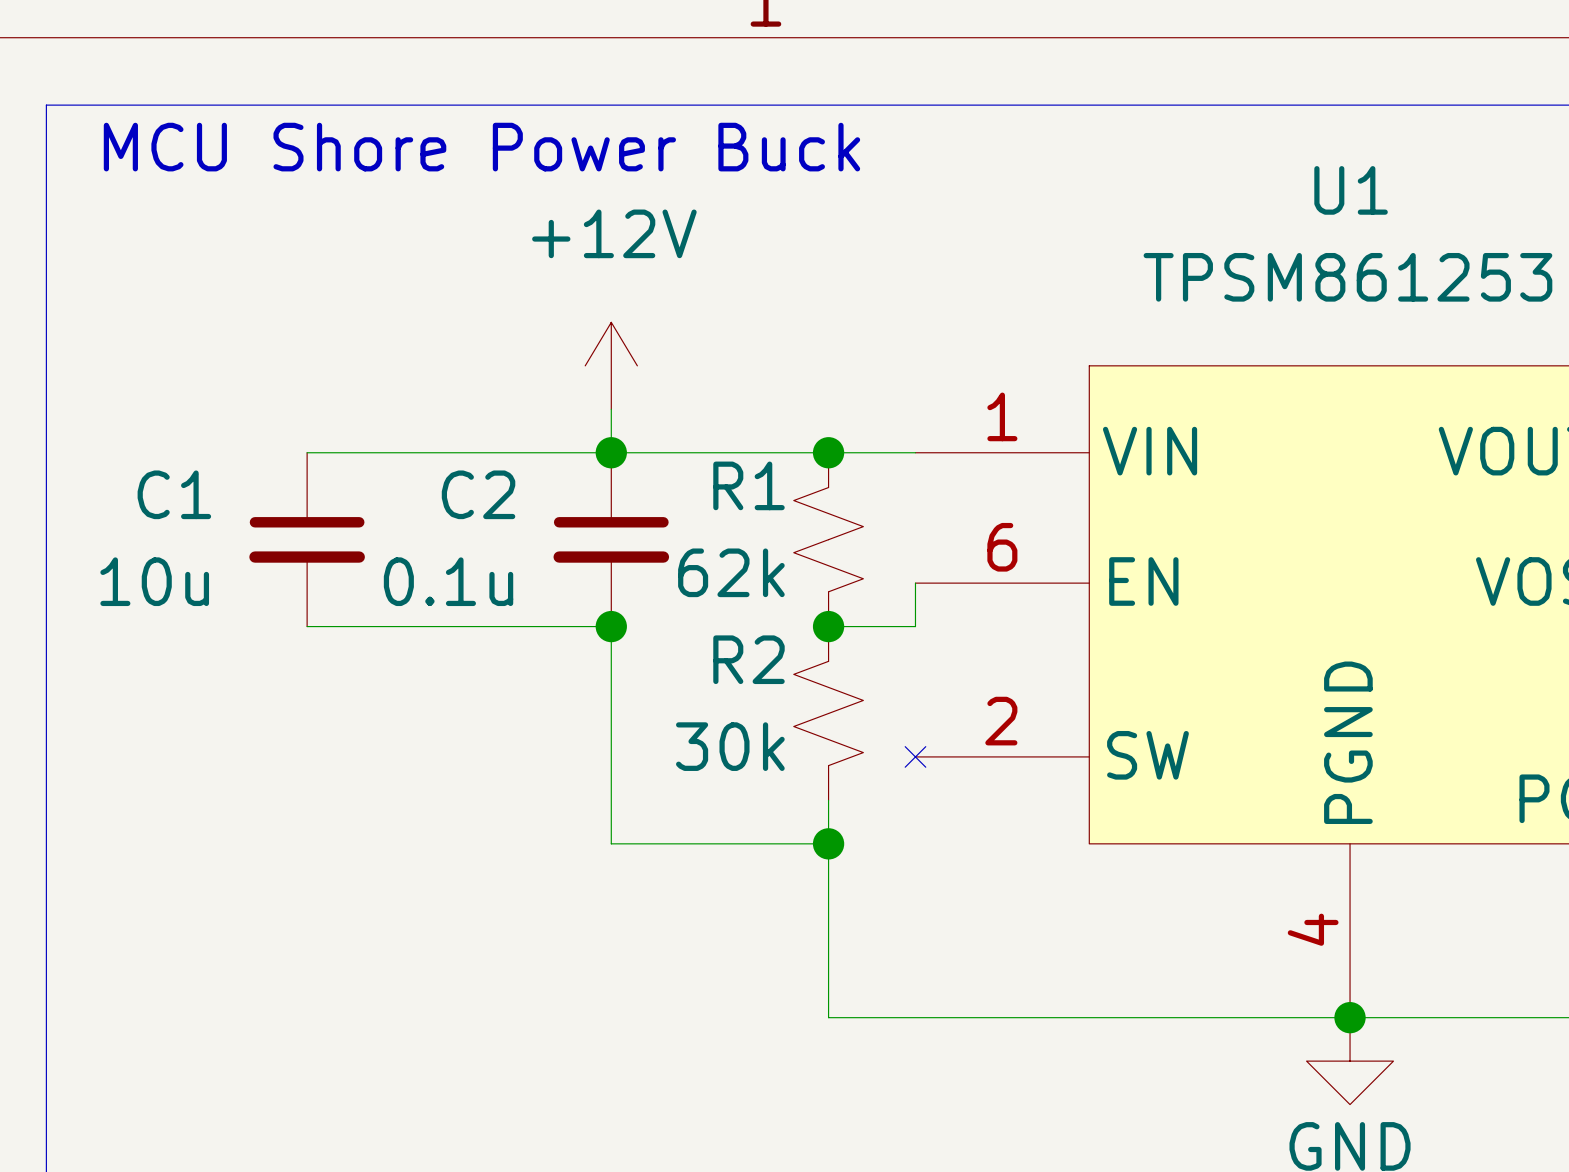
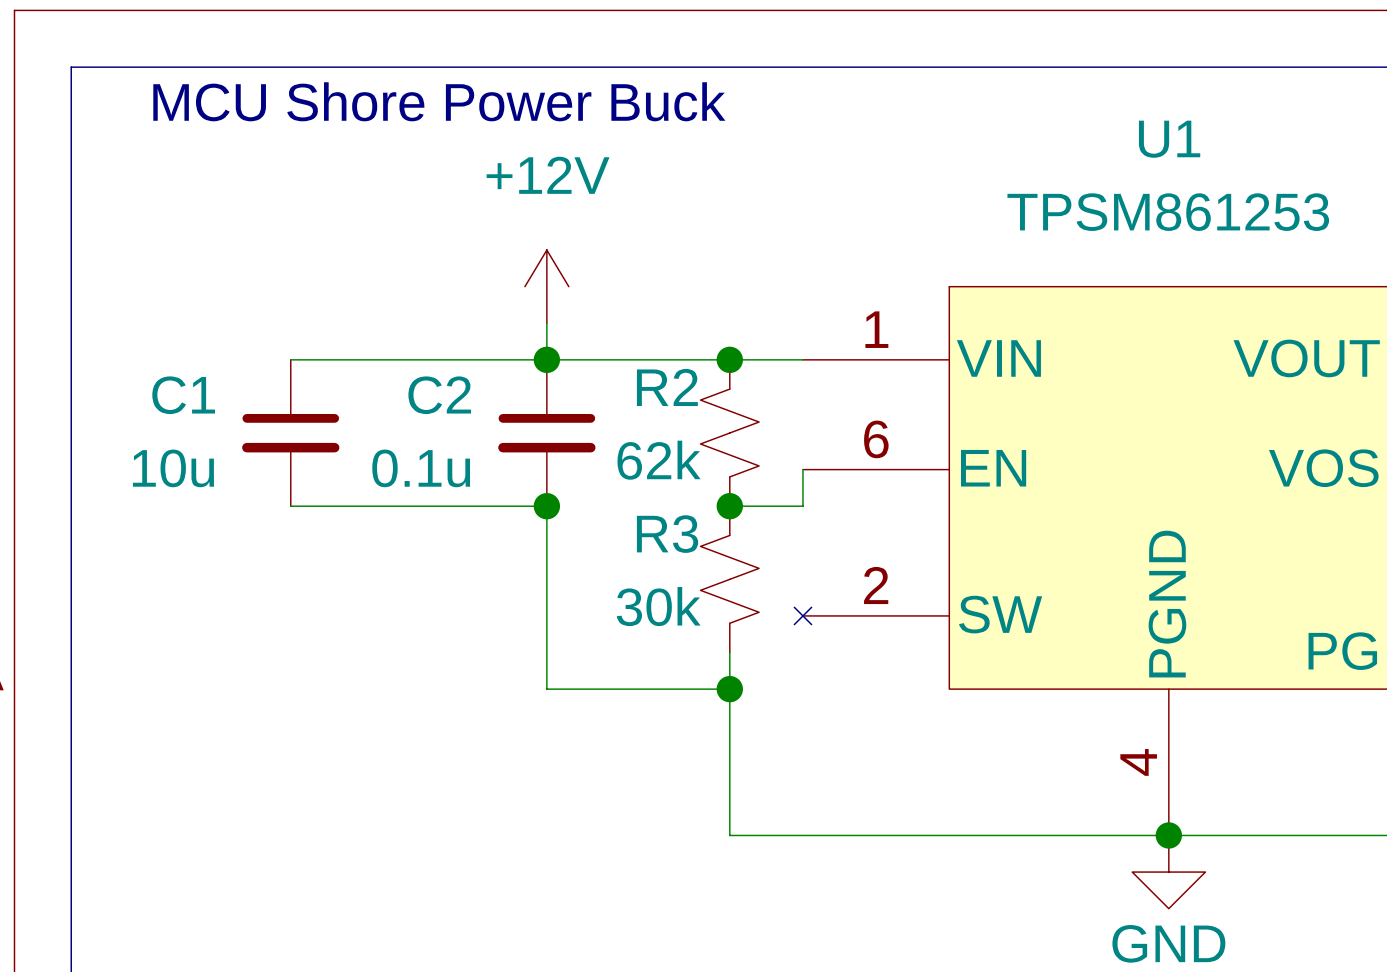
R1 name: R1 (748, 485) -> R2 (667, 387)
R2 name: R2 (748, 659) -> R3 (667, 534)

